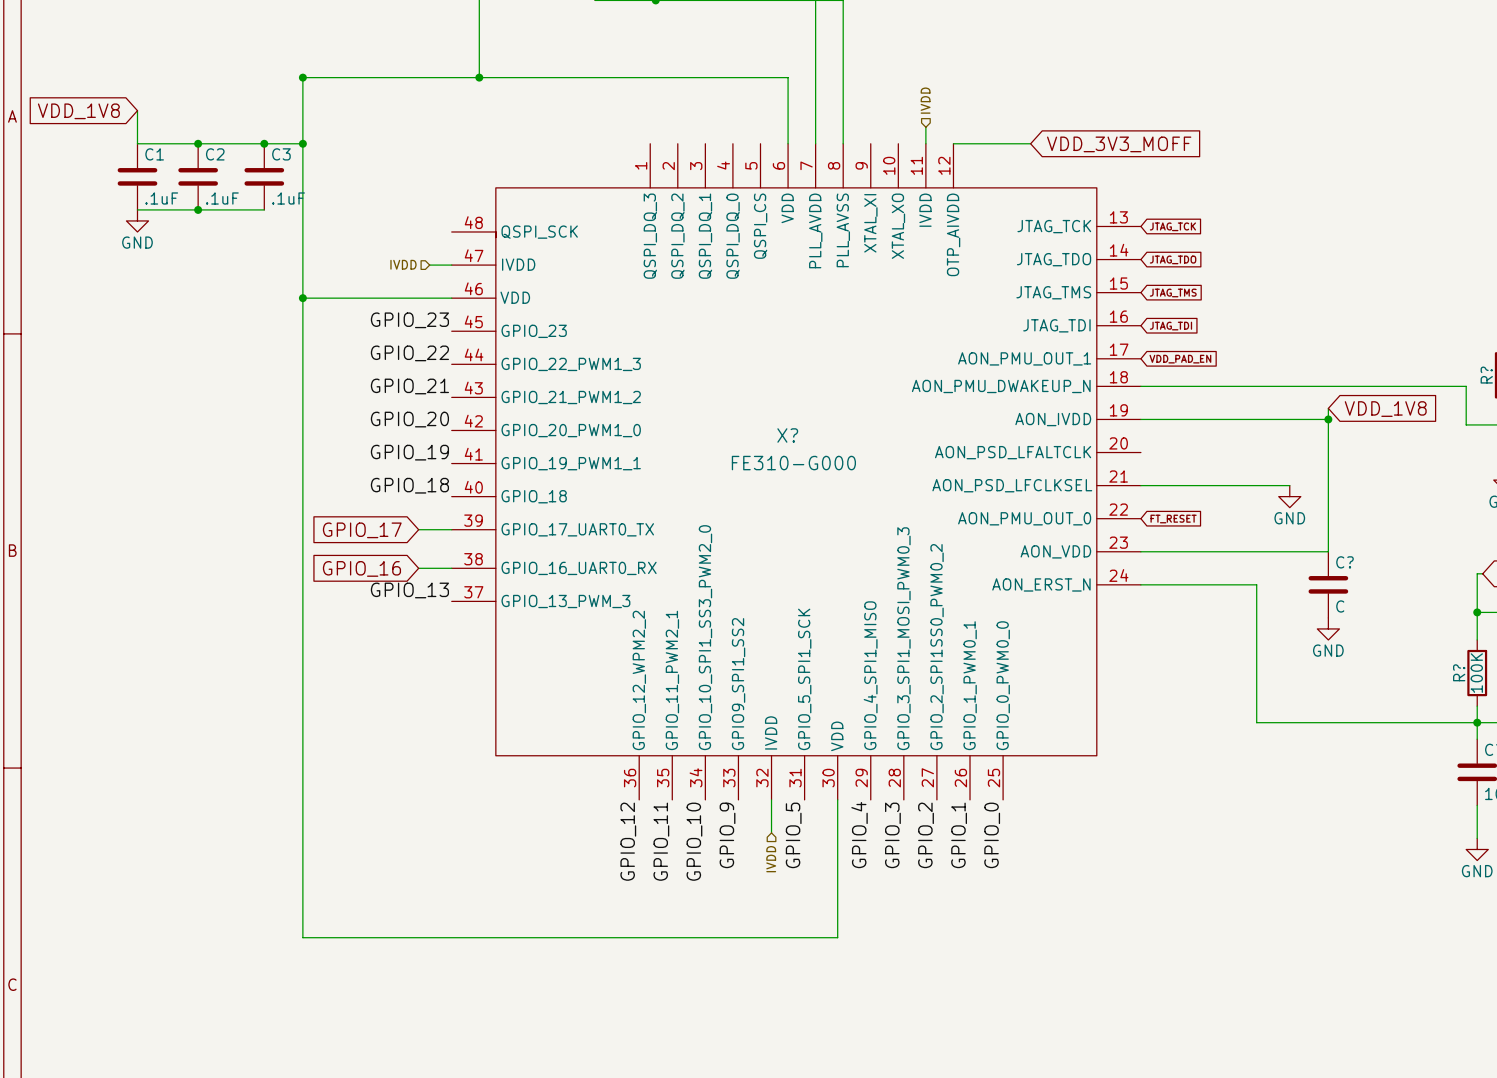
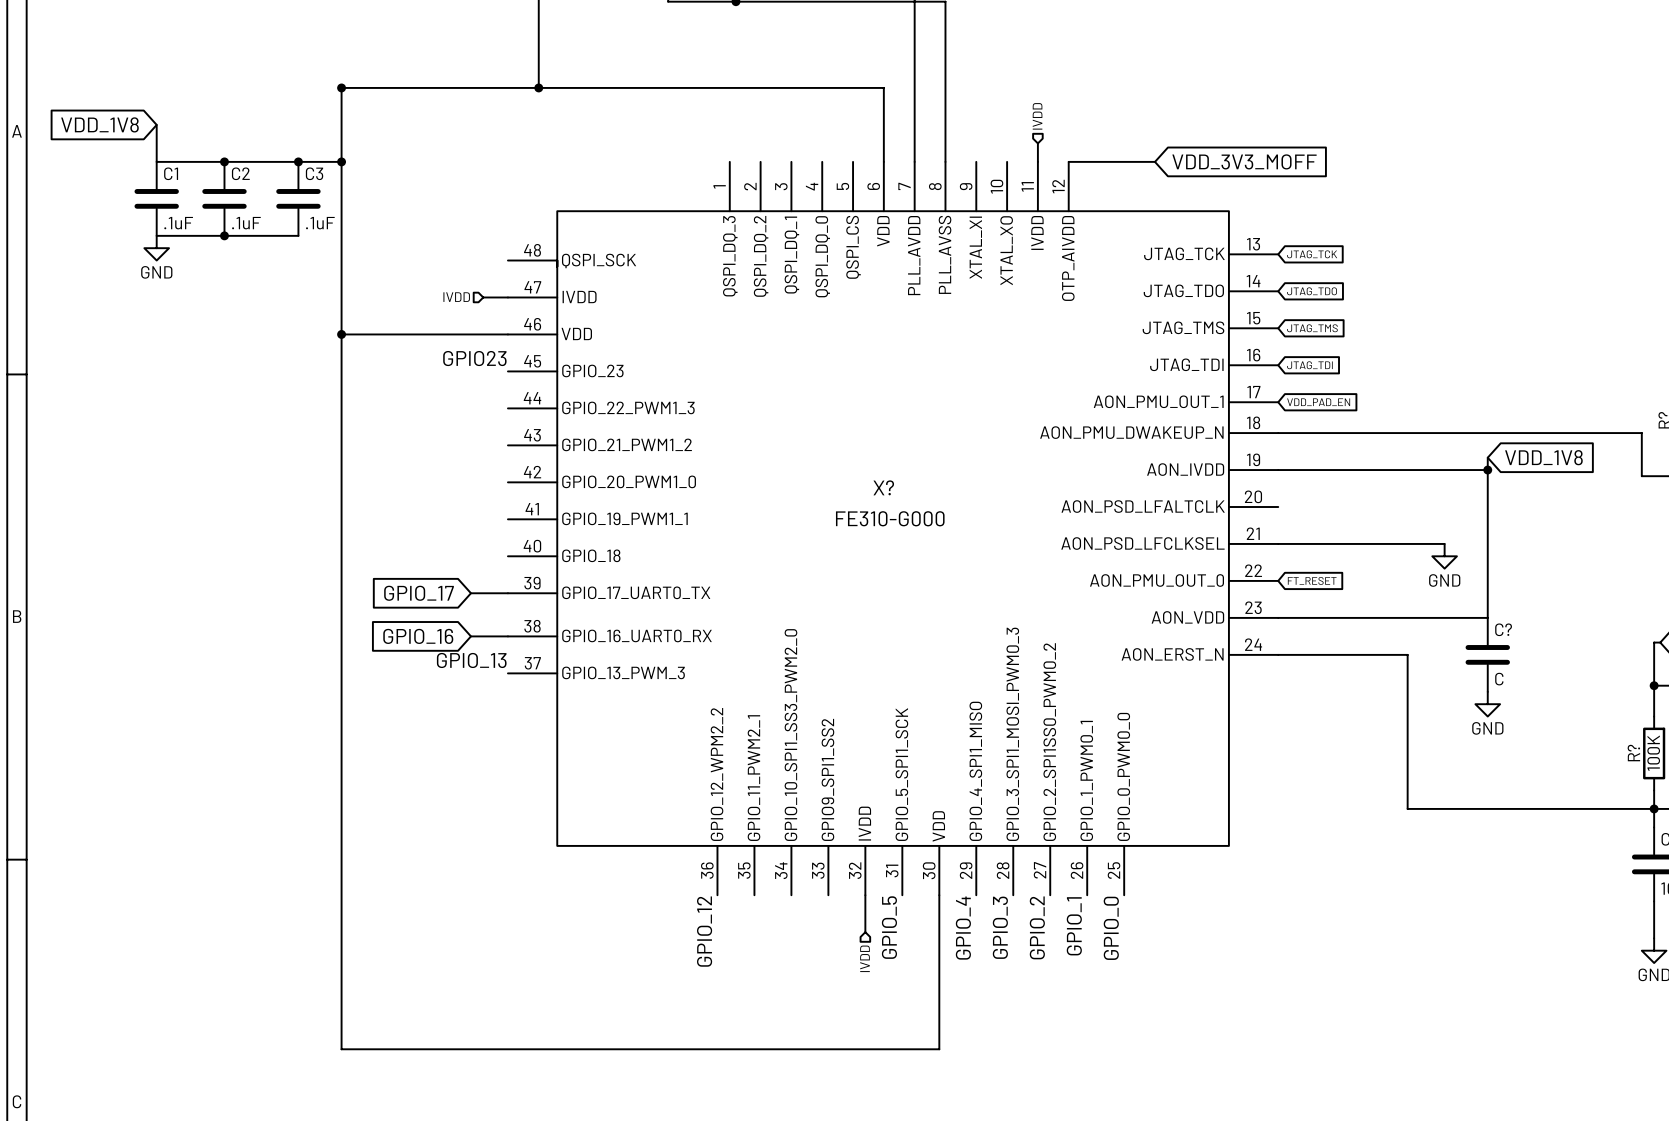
label: GPIO_23 (409, 320) -> GPIO23 (474, 358)
label: GPIO_22 (409, 353) -> none
label: GPIO_21 (409, 386) -> none
label: GPIO_20 (409, 419) -> none
label: GPIO_19 (409, 452) -> none
label: GPIO_18 (409, 485) -> none
label: GPIO_9 (727, 835) -> none
label: GPIO_11 (661, 841) -> none
label: GPIO_10 (694, 841) -> none

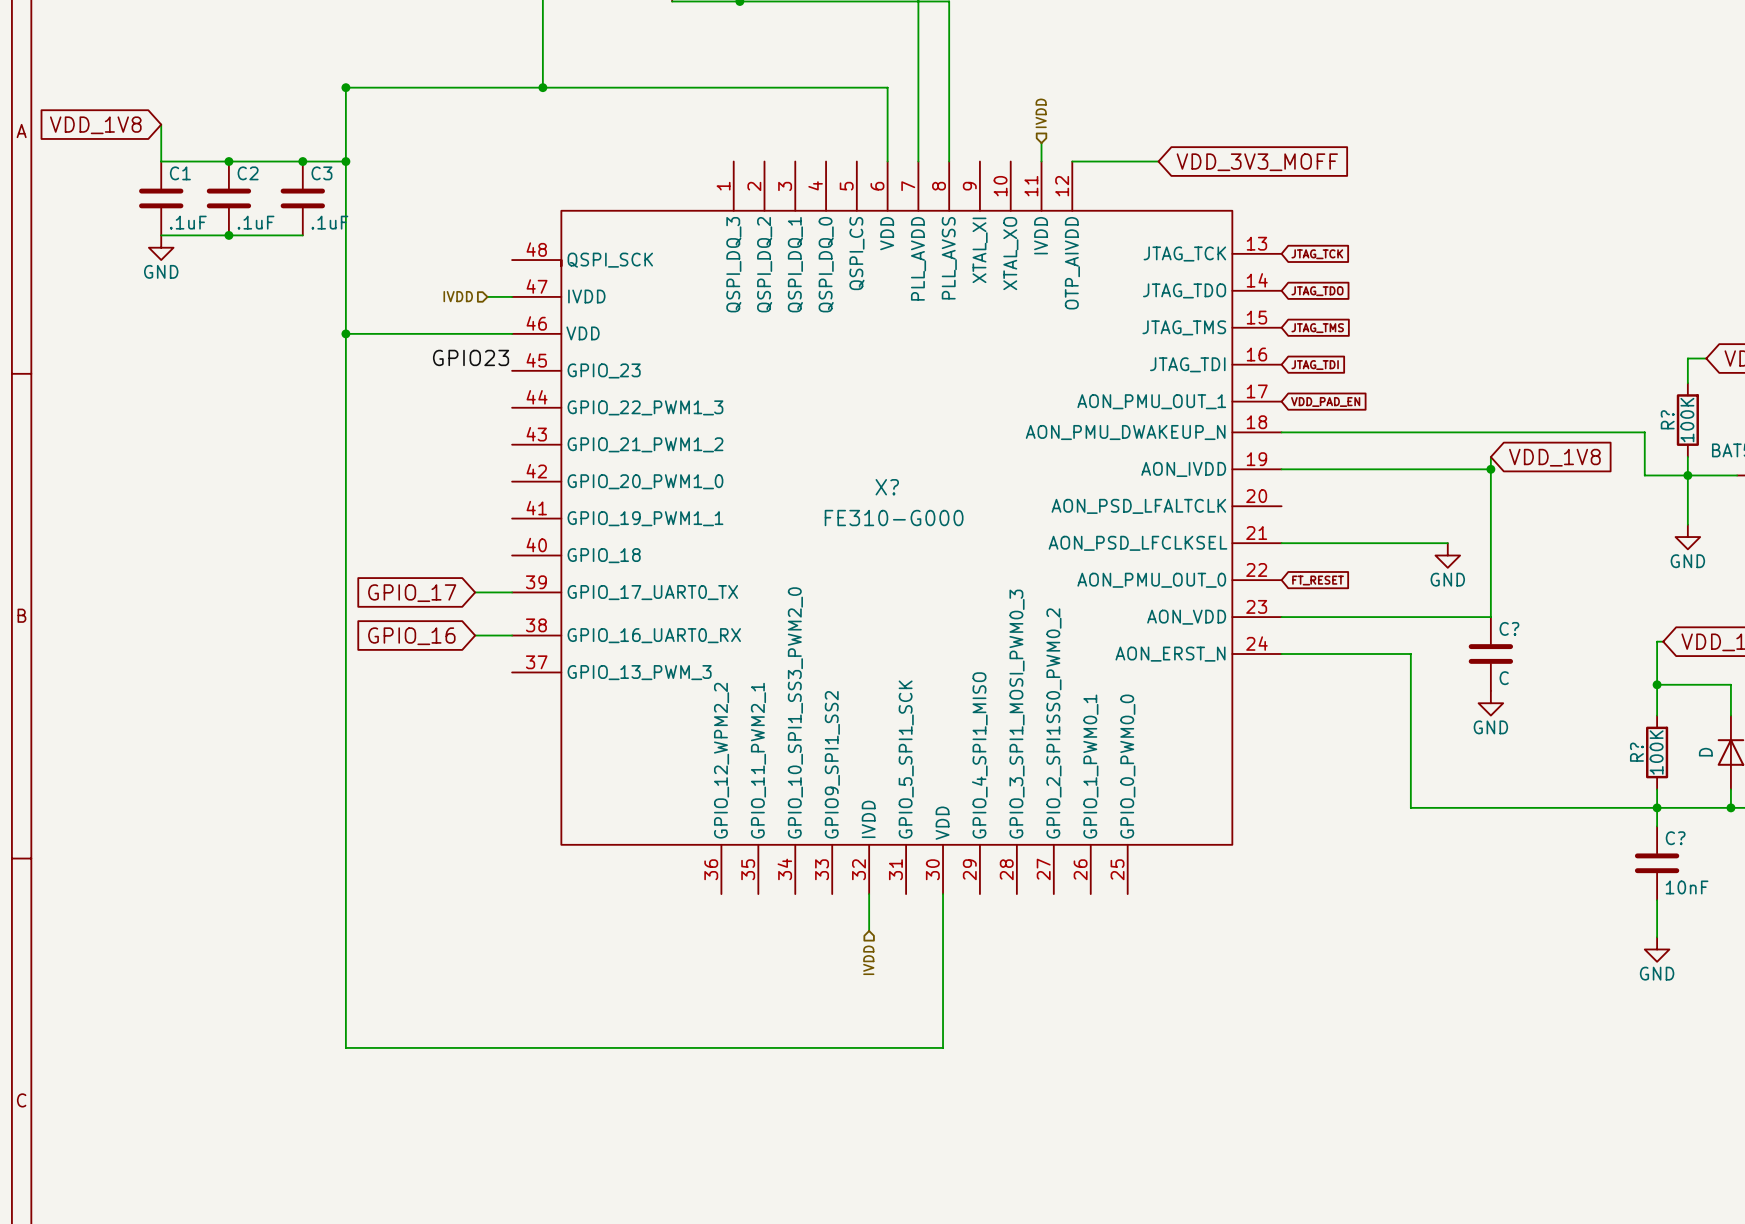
label: GPIO_13 (471, 660) -> none
label: GPIO_1 (1074, 926) -> none
label: GPIO_5 (889, 927) -> none
label: GPIO_3 (1000, 927) -> none
label: GPIO_2 (1037, 927) -> none
label: GPIO_4 (963, 928) -> none
label: GPIO_0 (1111, 928) -> none
label: GPIO_12 (704, 931) -> none

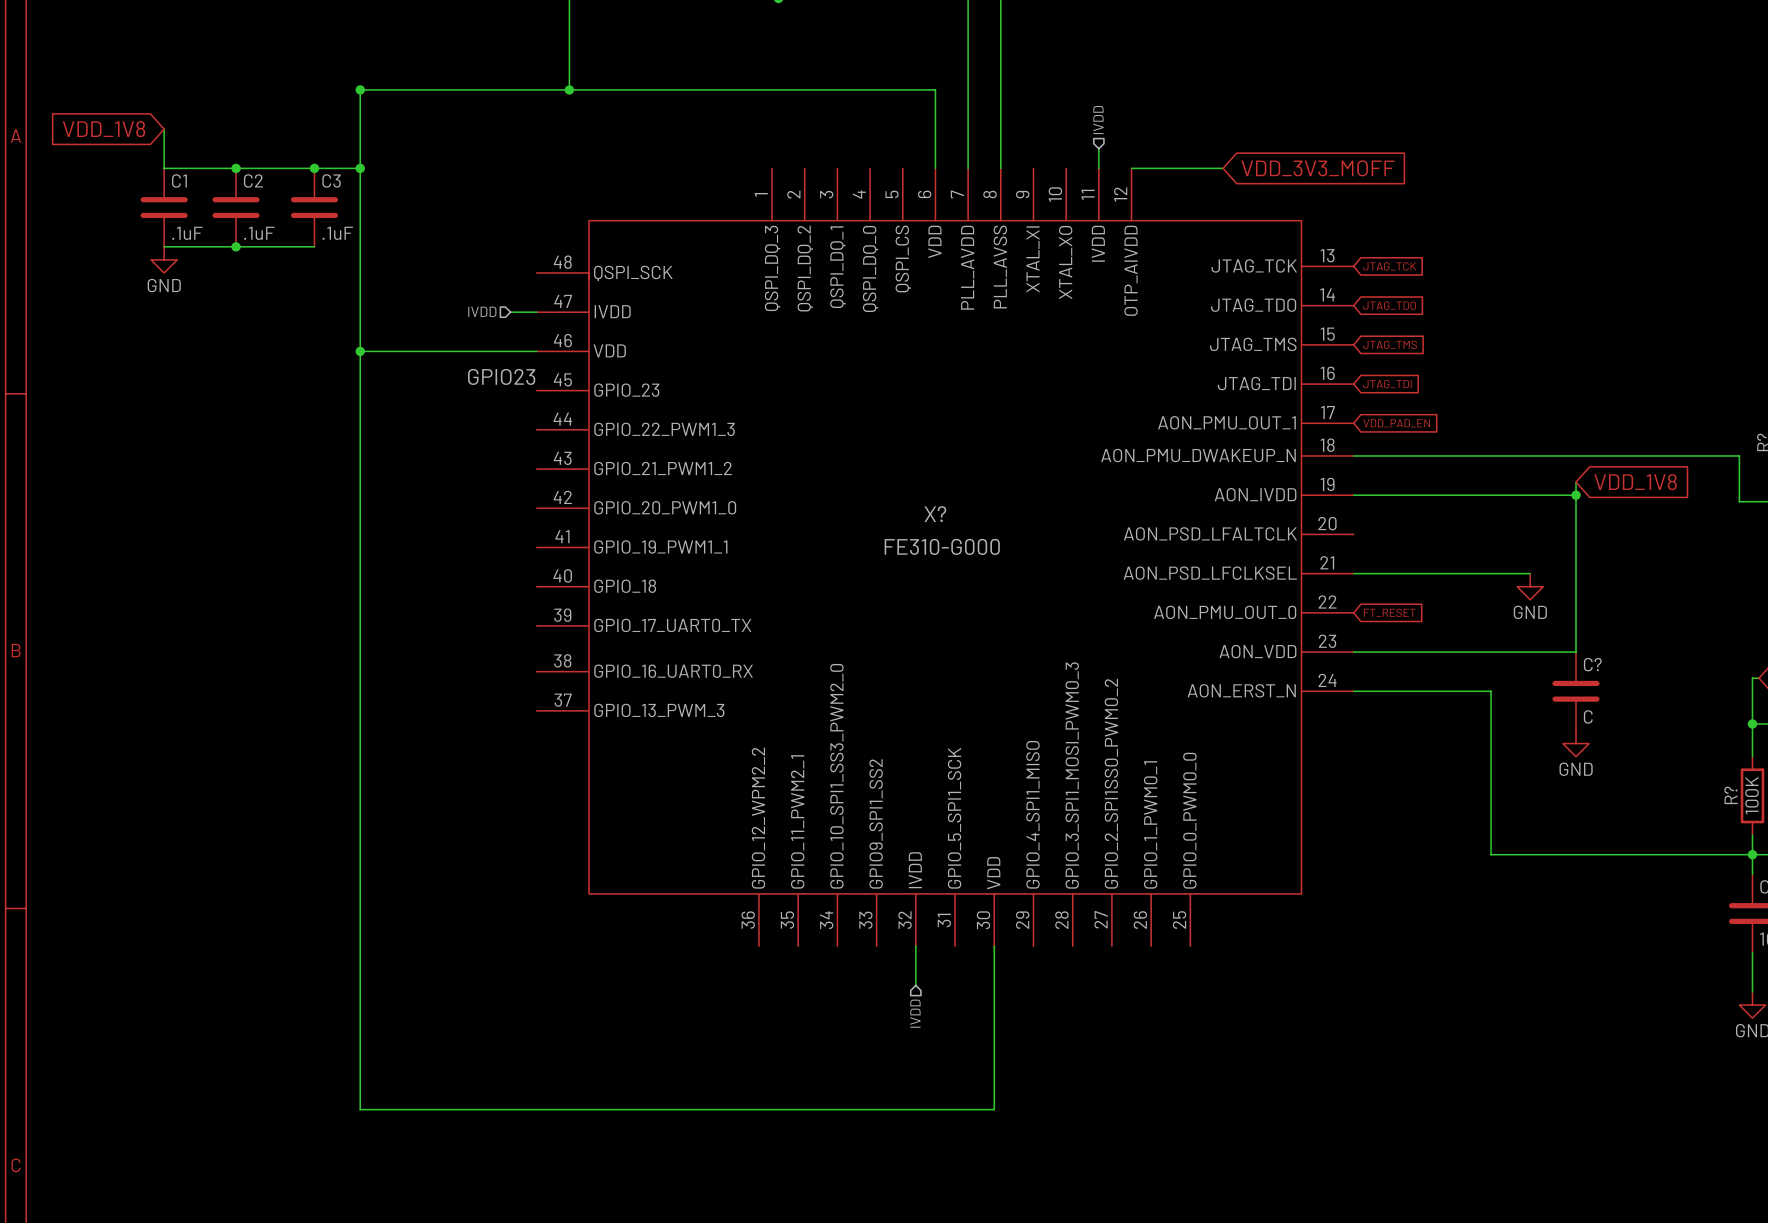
wire: (475, 592) (512, 592) -> none
global label: GPIO_17 (412, 593) -> none
wire: (475, 635) (512, 635) -> none
global label: GPIO_16 (411, 636) -> none

